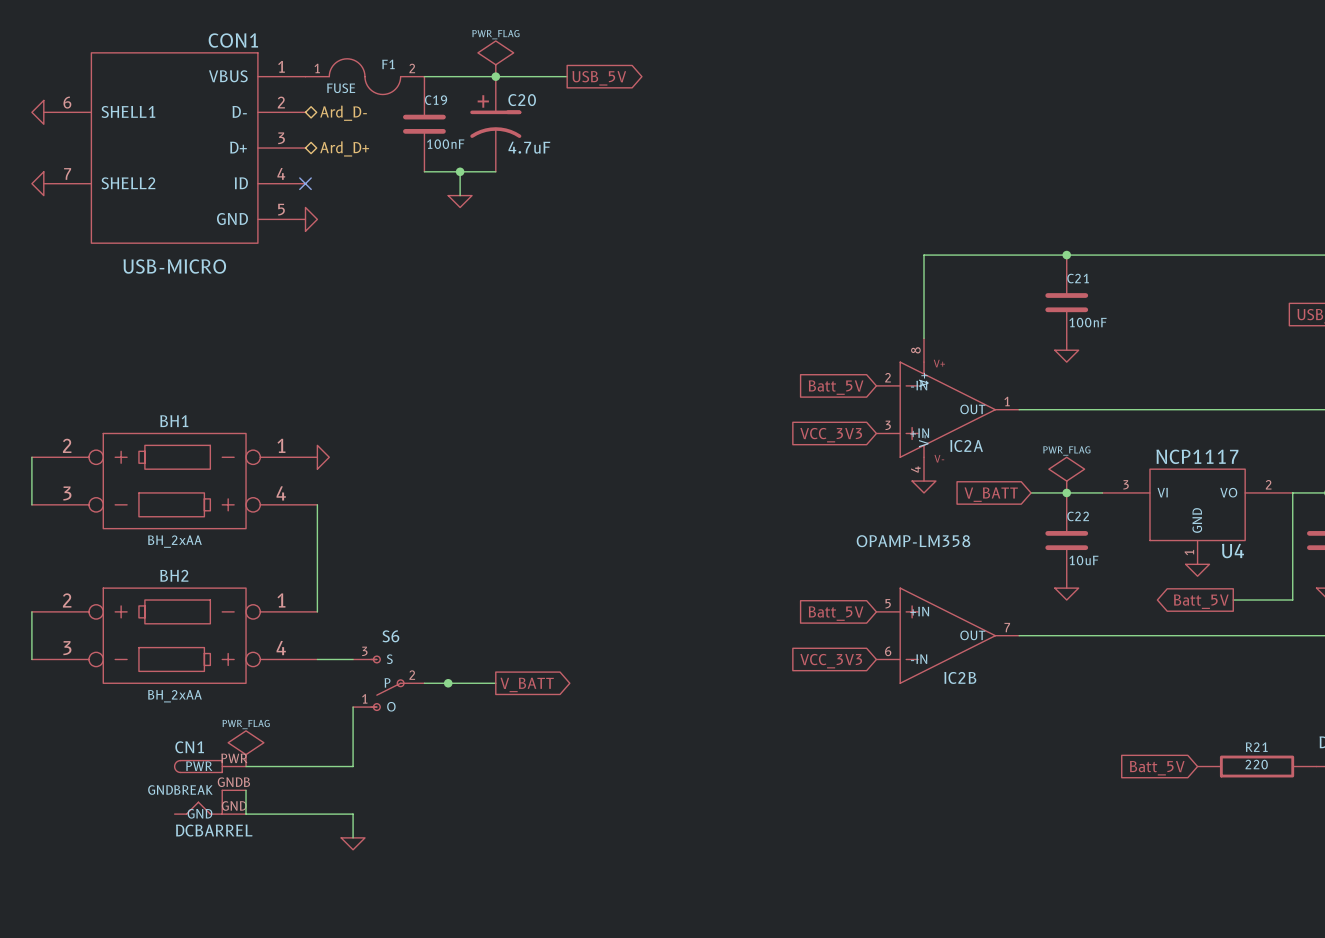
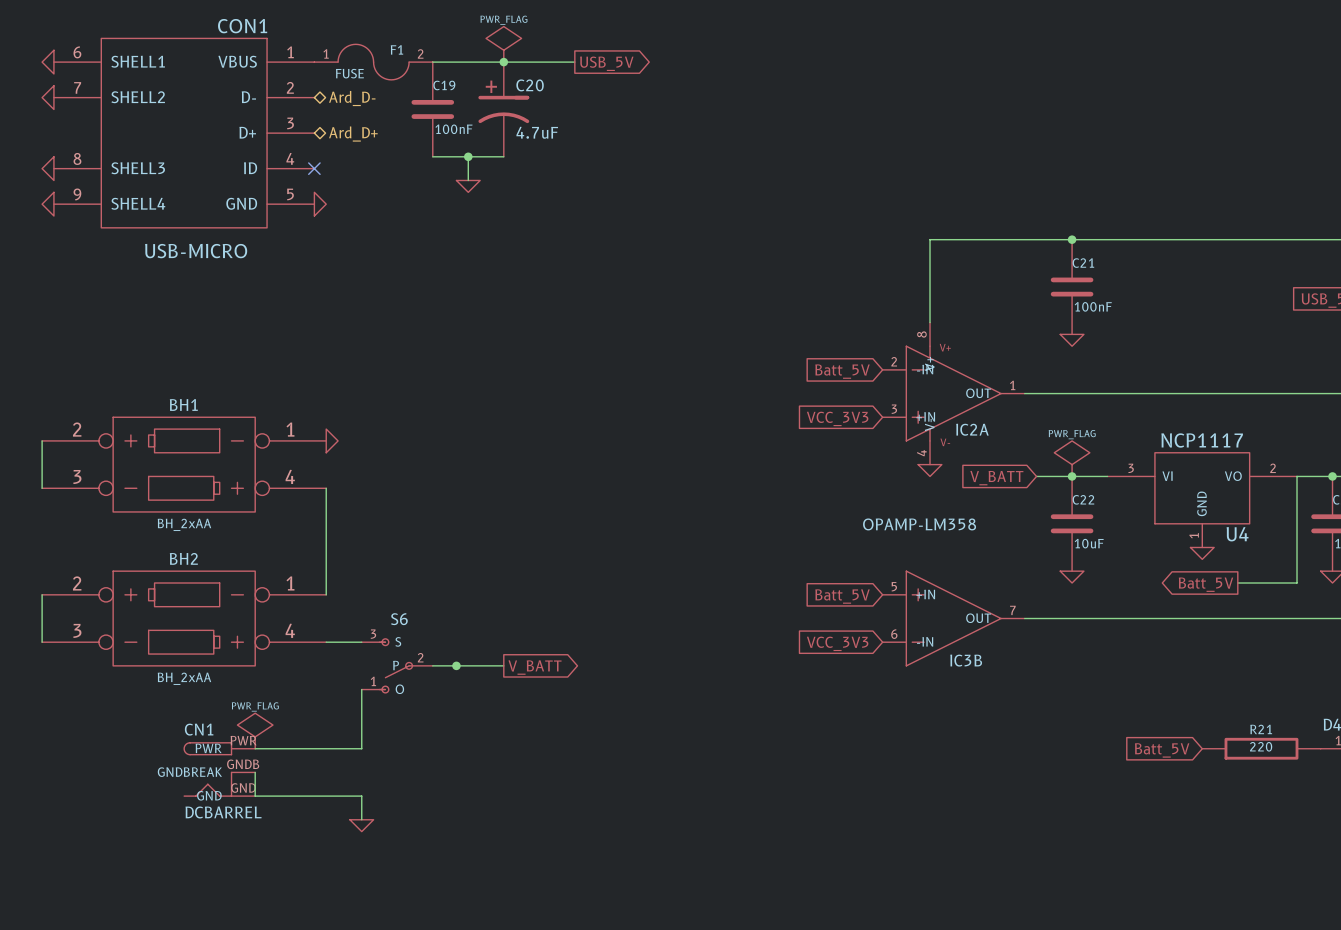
CON1 symbol: [43, 52, 306, 244] -> [53, 38, 315, 228]
power symbol: none -> (48, 62)
power symbol: none -> (48, 204)
IC2B name: IC2B (960, 677) -> IC3B (966, 660)

